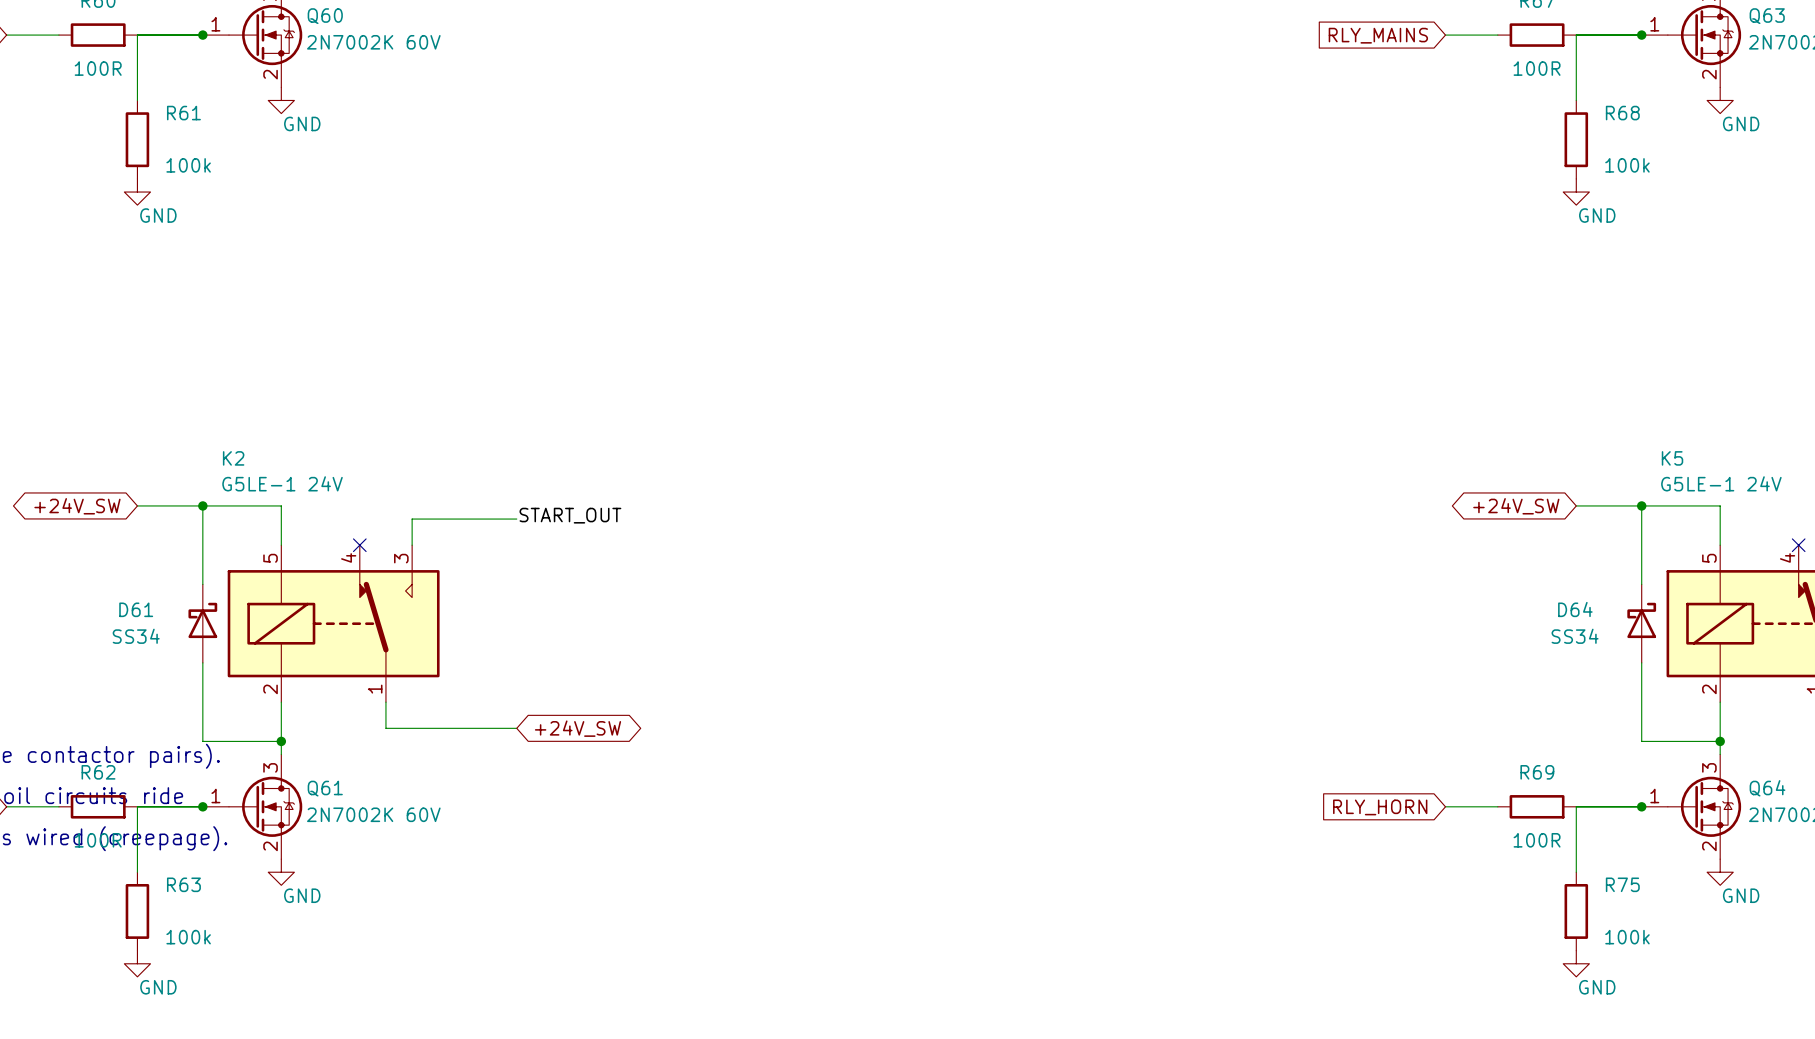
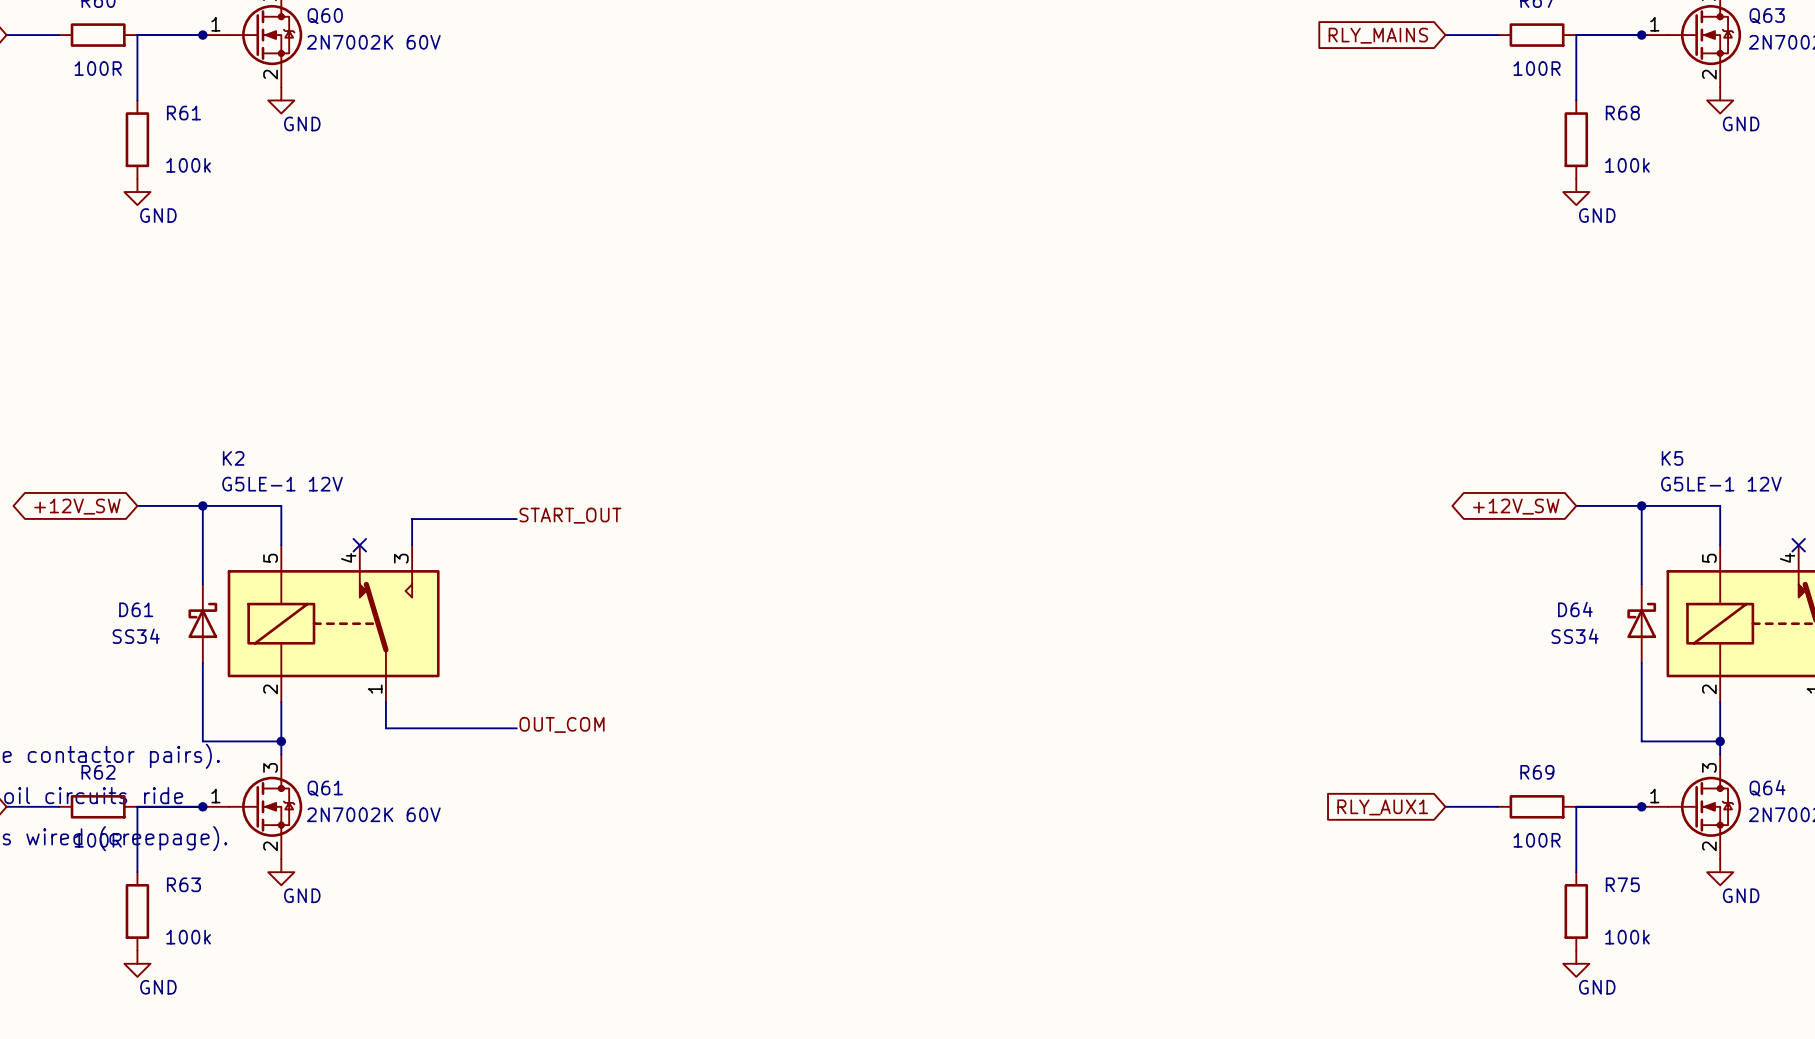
K2 value: G5LE-1 24V (282, 483) -> G5LE-1 12V (282, 484)
K5 value: G5LE-1 24V (1721, 483) -> G5LE-1 12V (1721, 484)
global label: +24V_SW (77, 506) -> +12V_SW (77, 506)
global label: +24V_SW (1516, 506) -> +12V_SW (1516, 506)
label: none -> OUT_COM (562, 724)
global label: +24V_SW (577, 728) -> none
global label: RLY_HORN (1380, 807) -> RLY_AUX1 (1382, 807)

